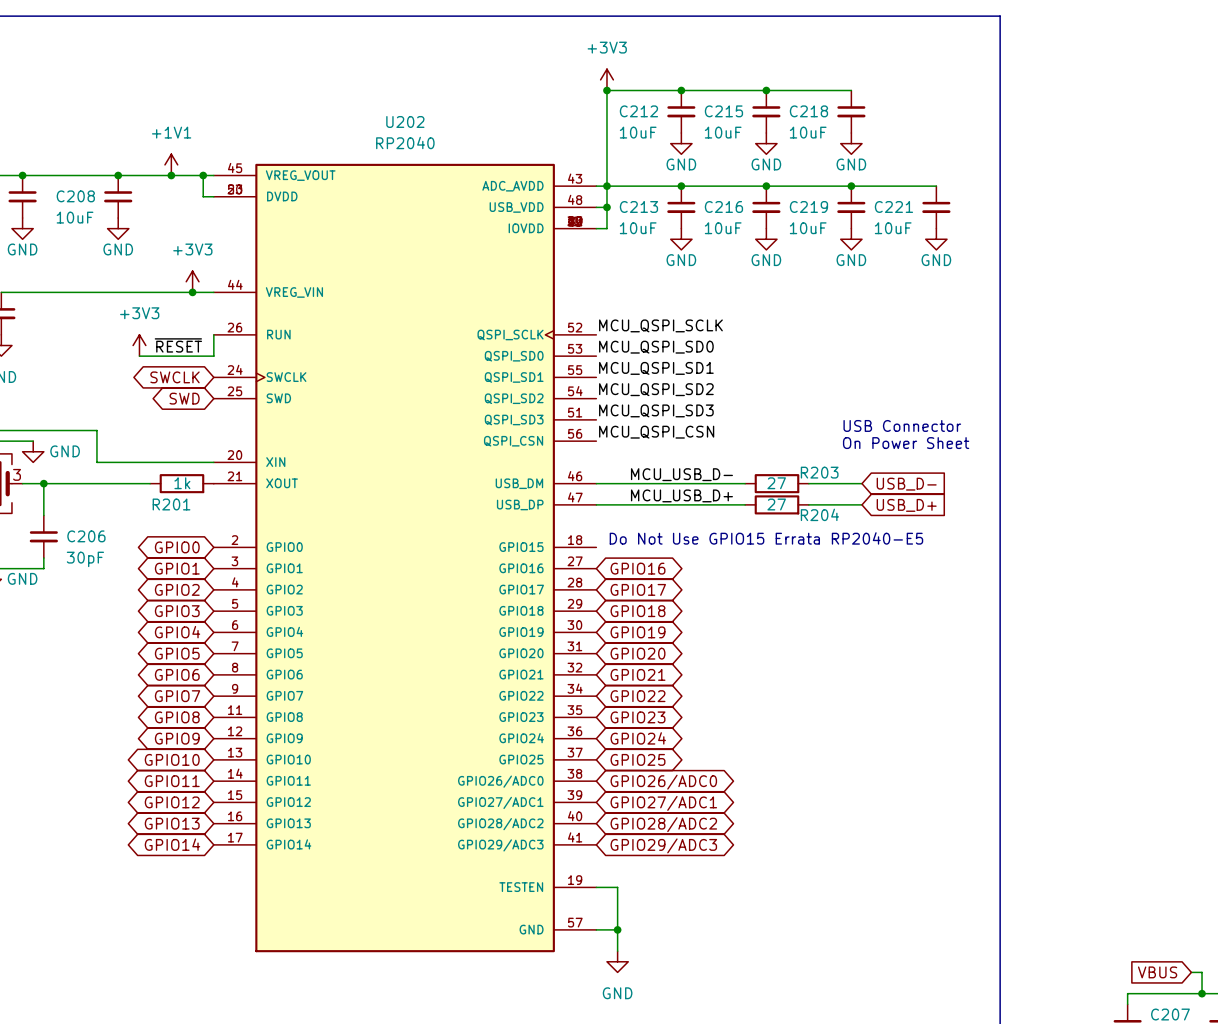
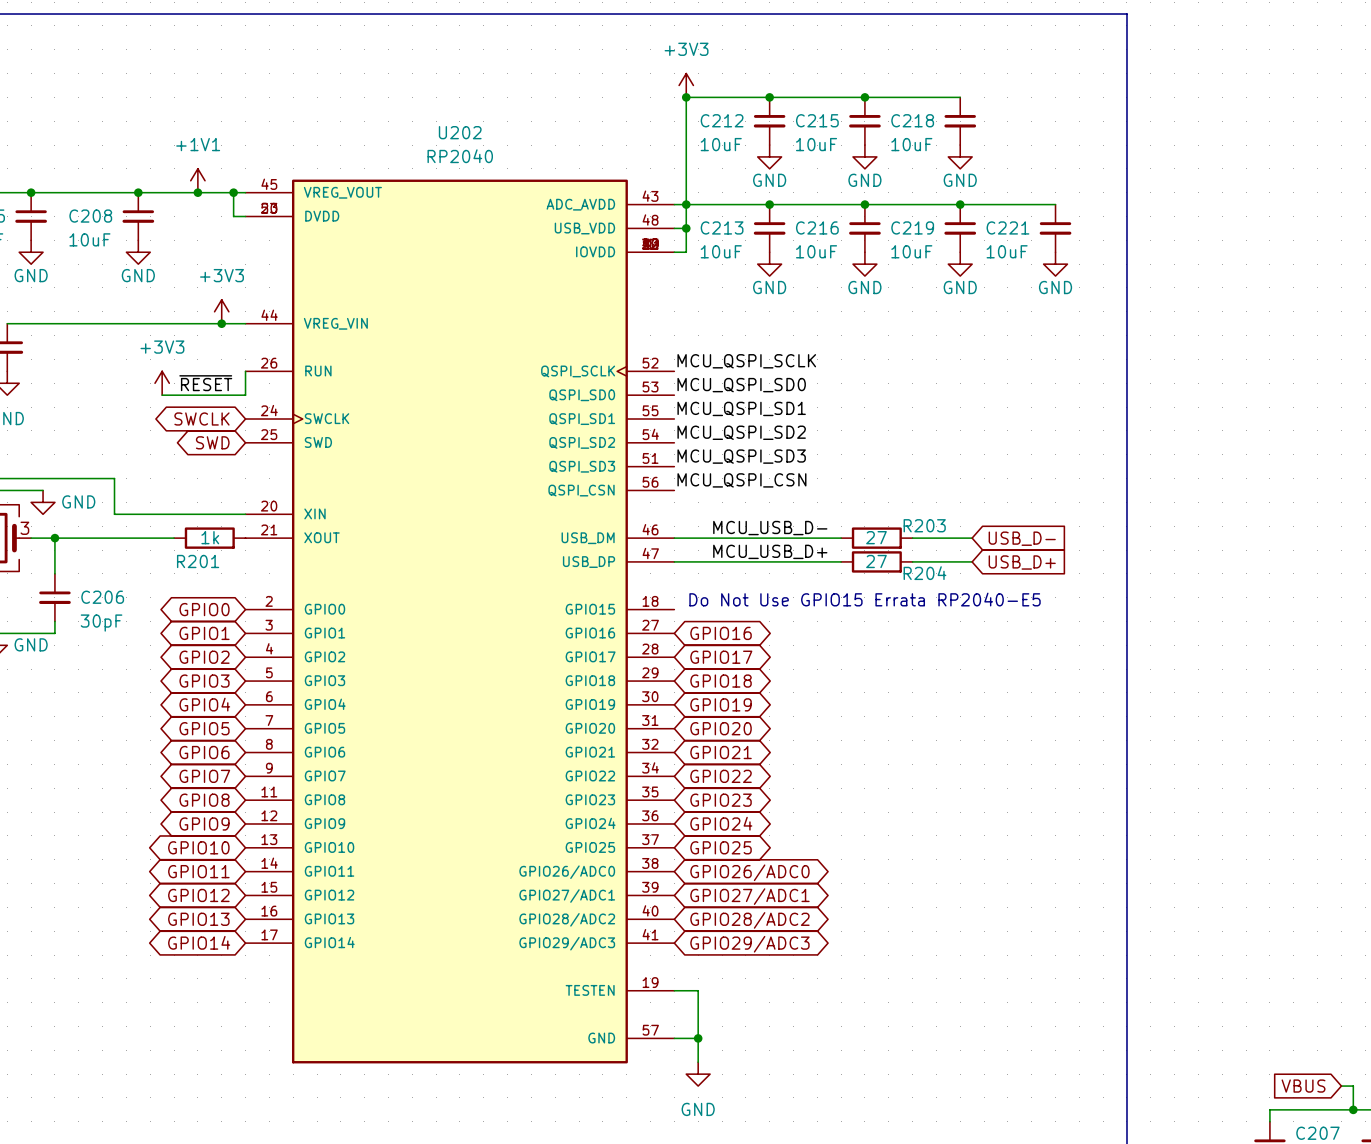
text: USB Connector (902, 425) -> none
text: On Power Sheet (906, 443) -> none

